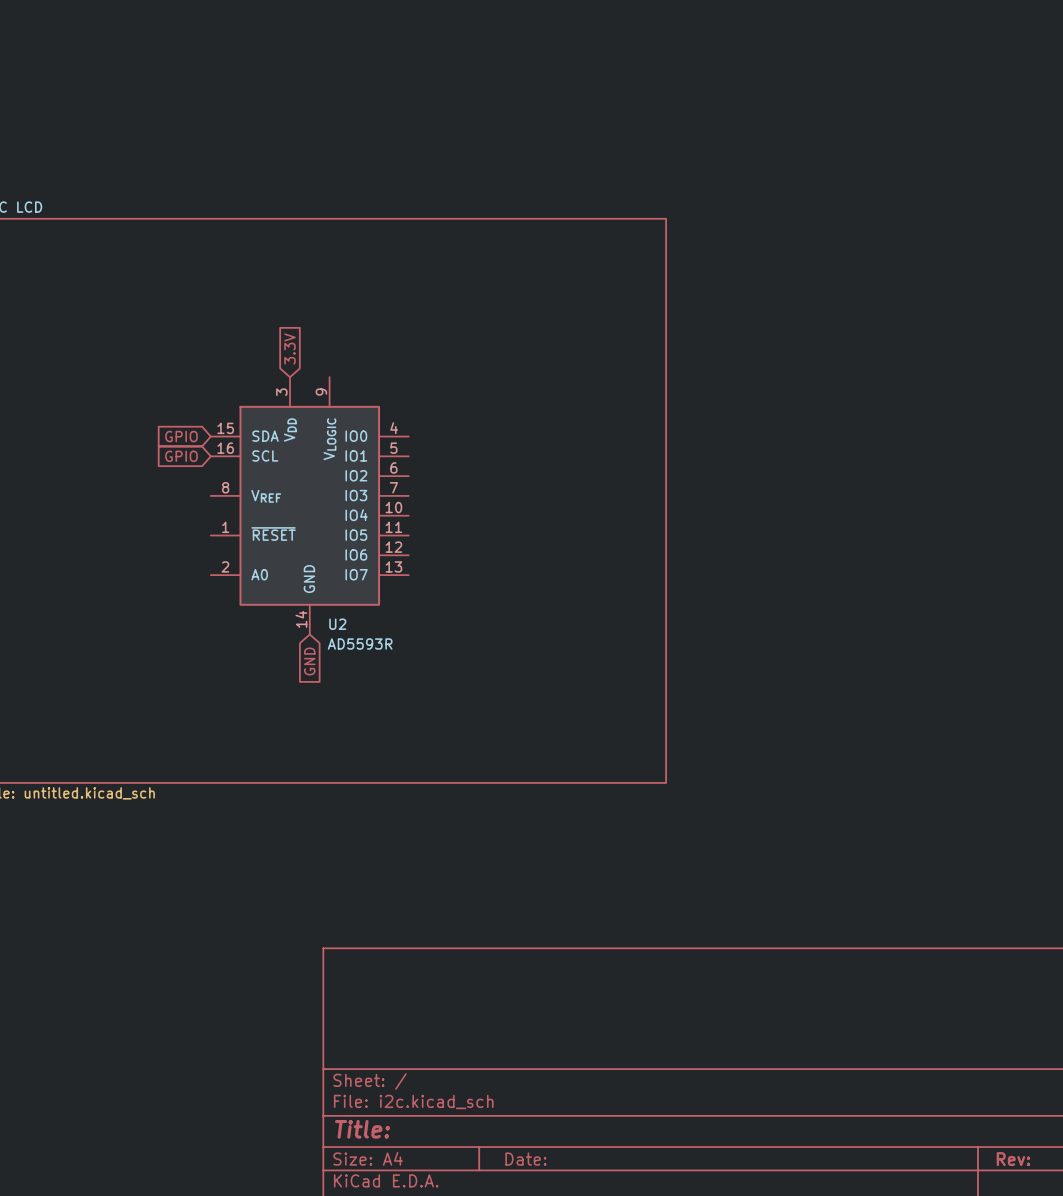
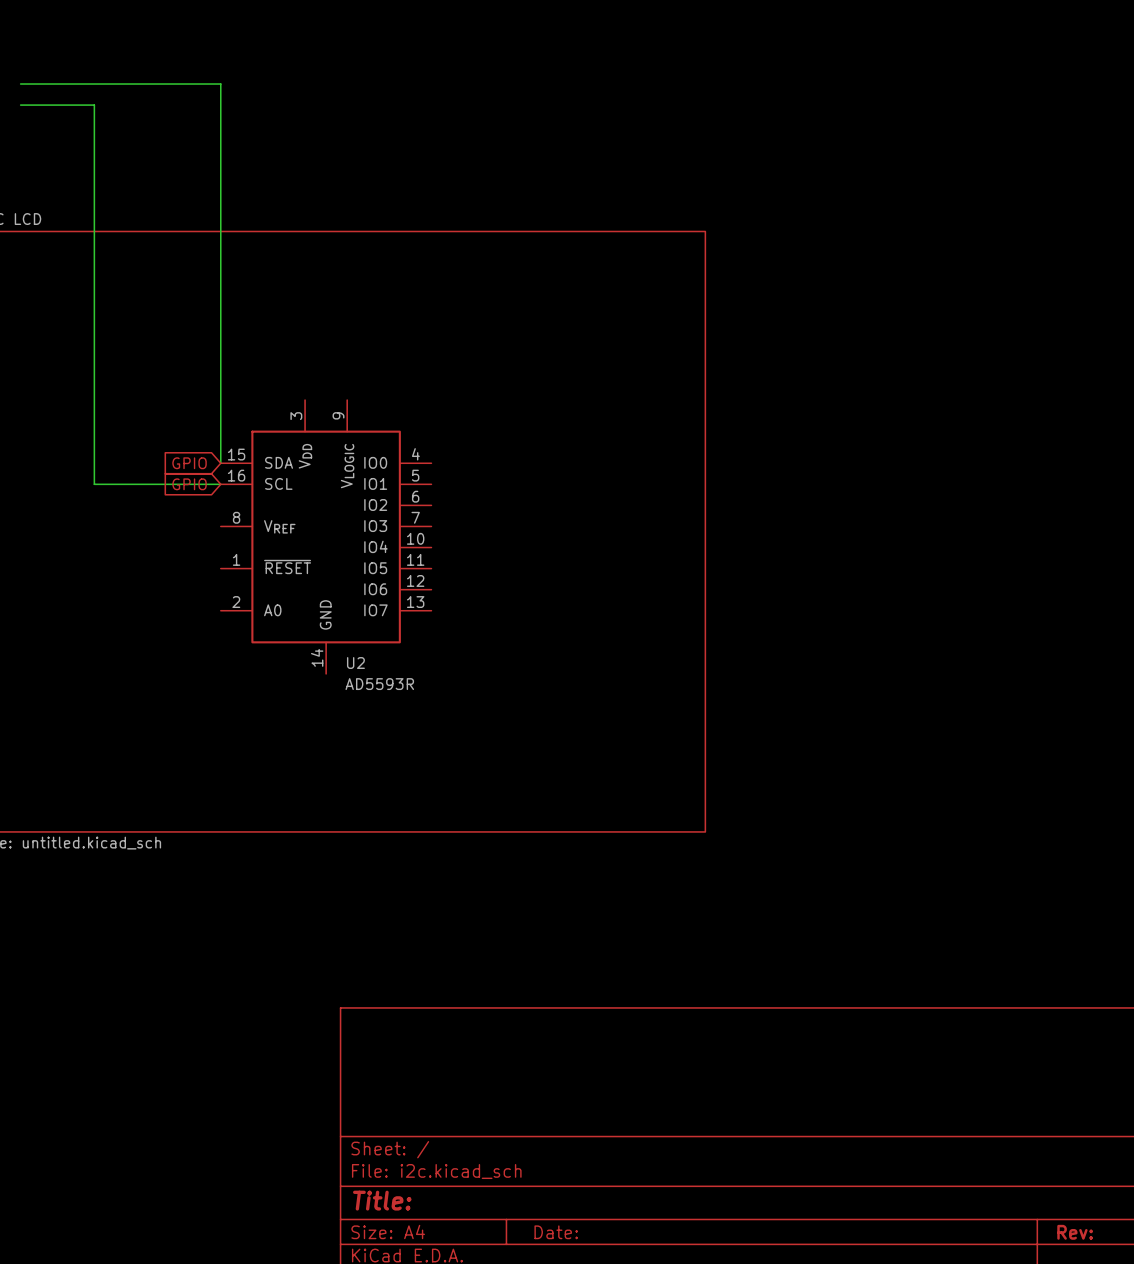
wire: none -> (20, 84) (220, 84) (220, 463)
wire: none -> (20, 105) (94, 105) (94, 484) (220, 484)
global label: 3.3V (289, 348) -> none
global label: GND (309, 661) -> none

